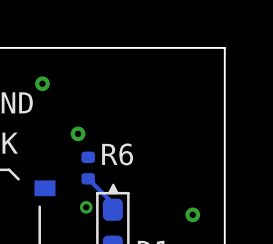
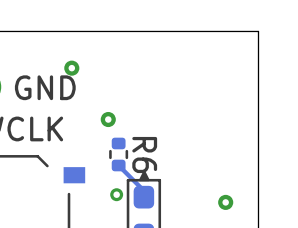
R6 footprint: [81, 151, 95, 185] -> [109, 137, 129, 172]

